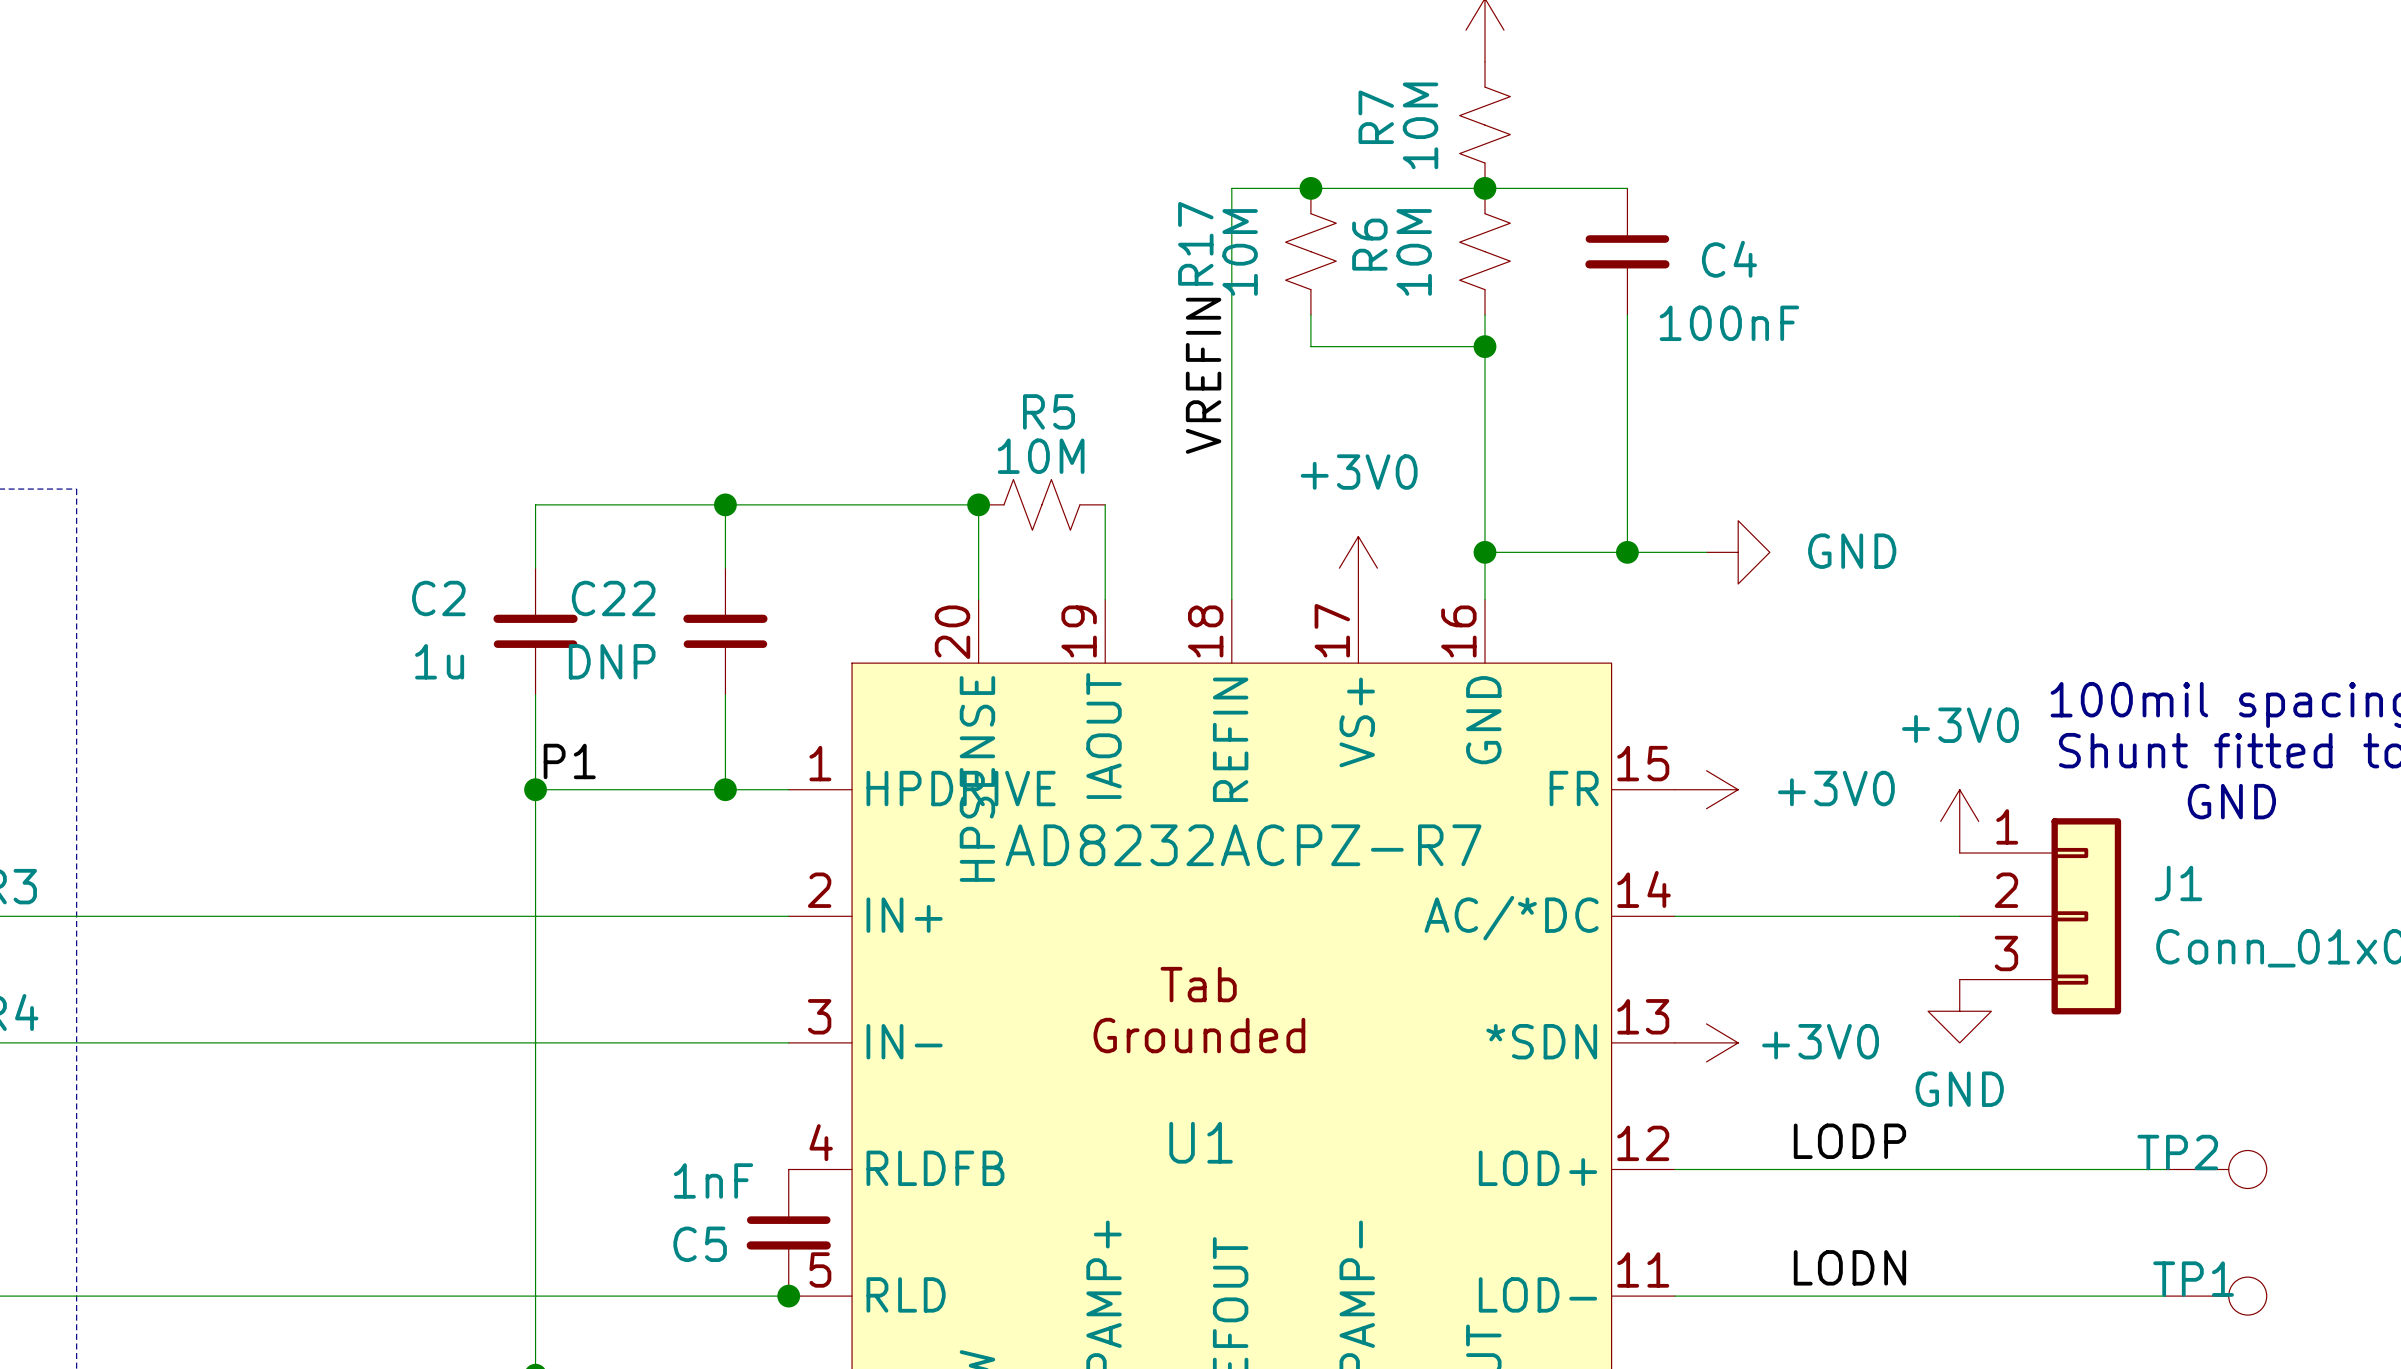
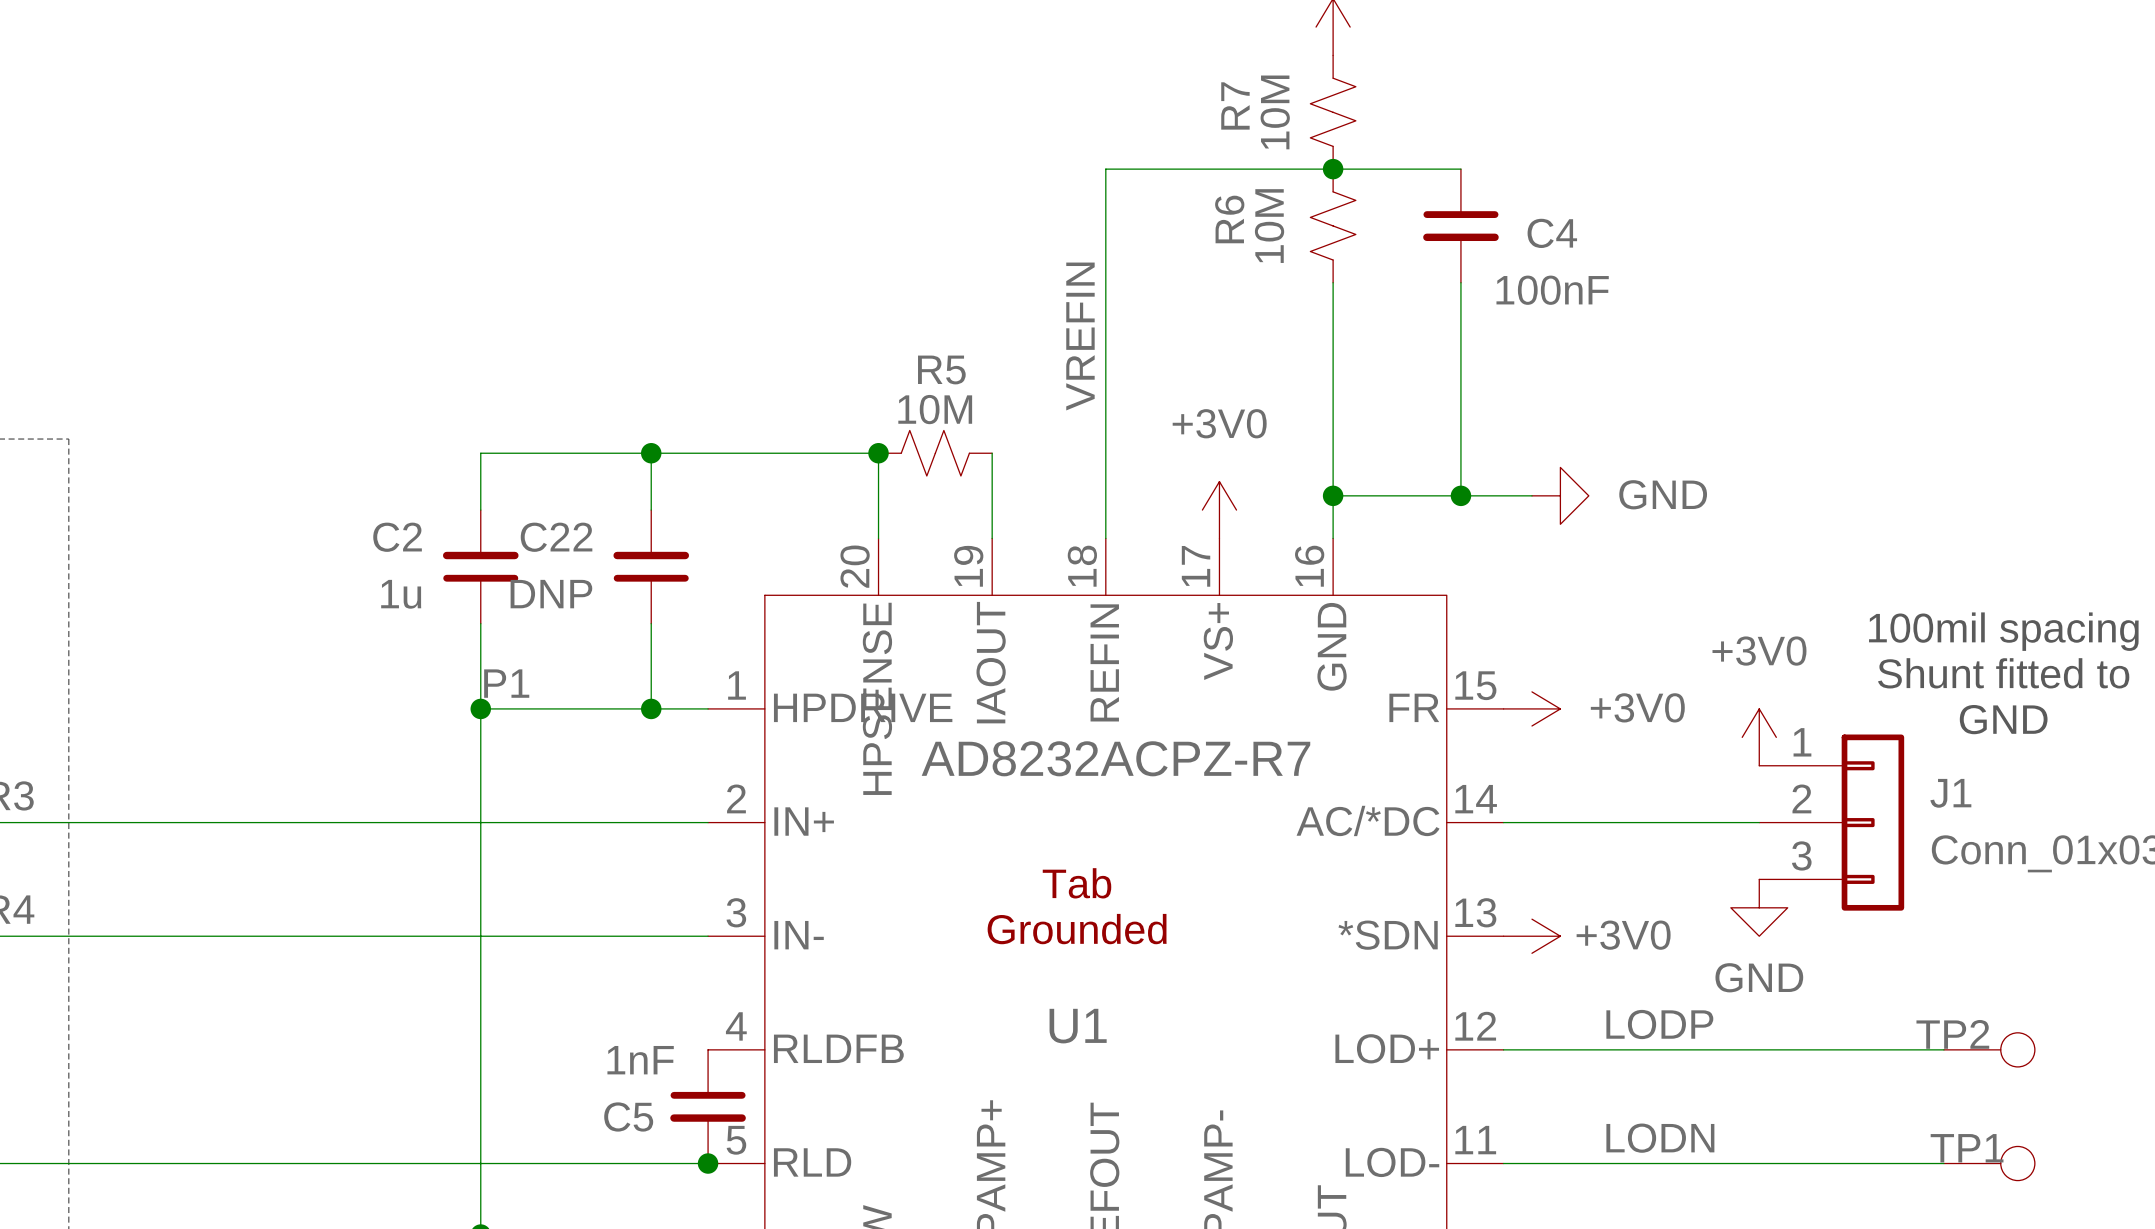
junction: (1310, 188) -> none
R17: 10M (1310, 251) -> none
wire: (1310, 314) (1310, 346) (1485, 346) -> none
junction: (1485, 346) -> none

